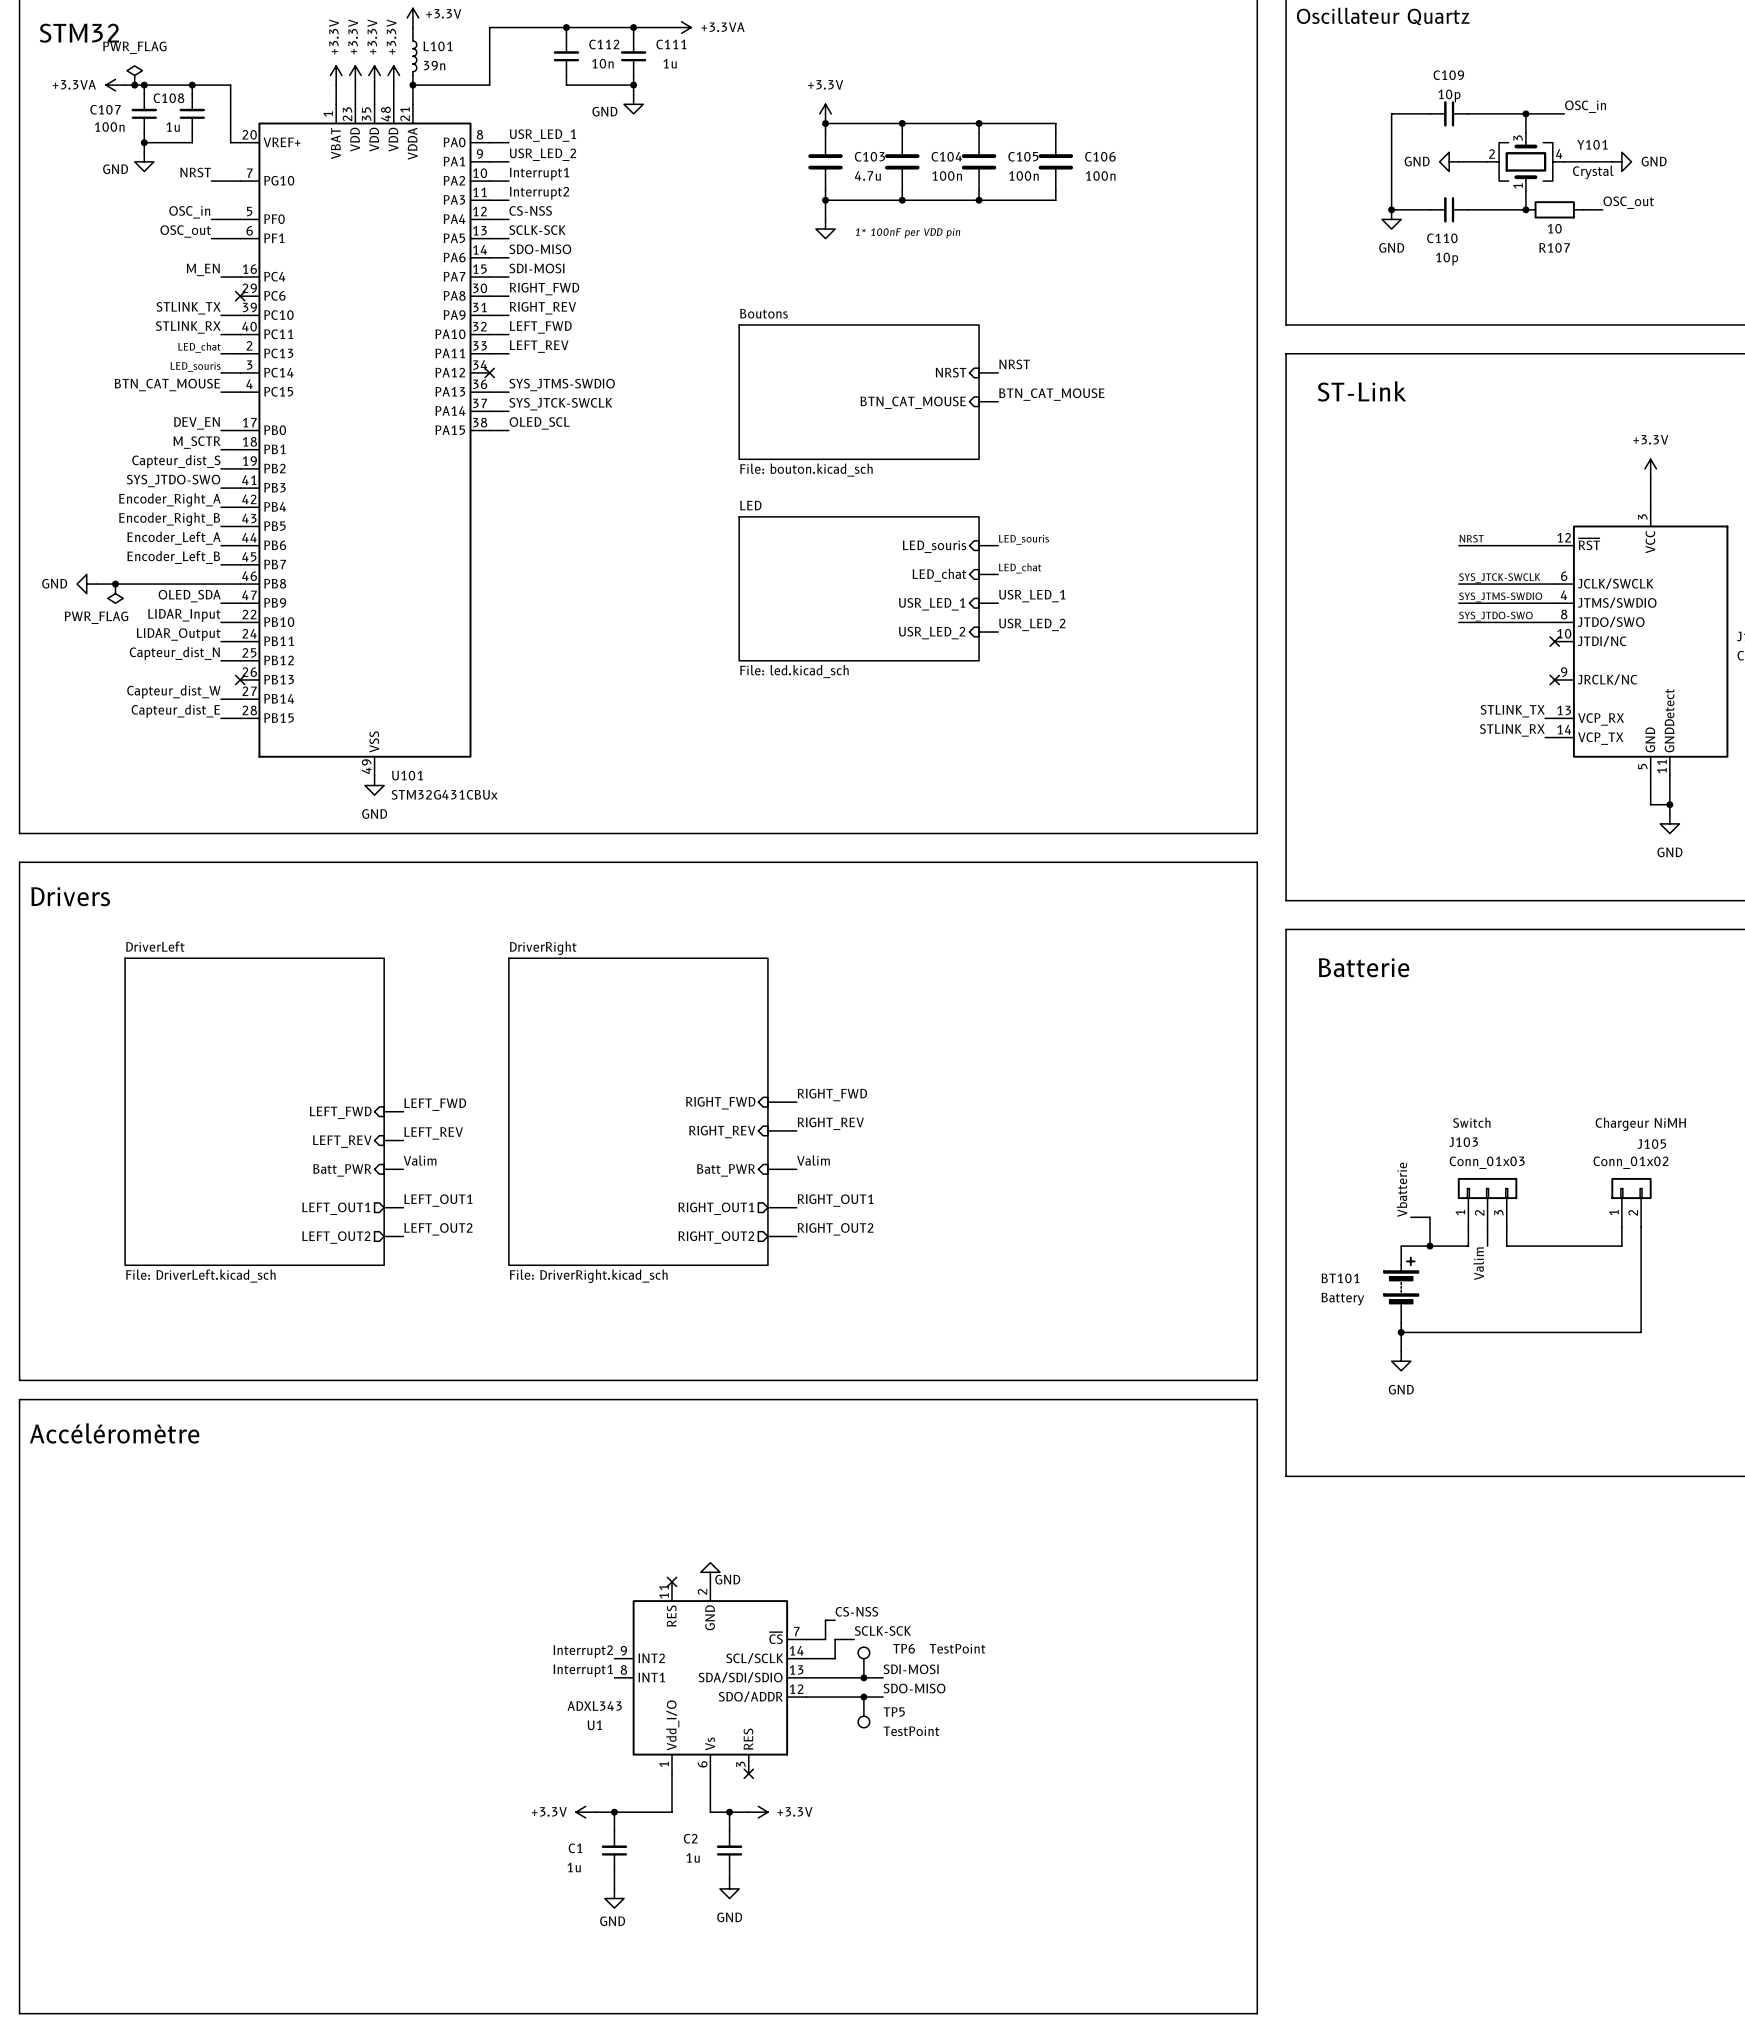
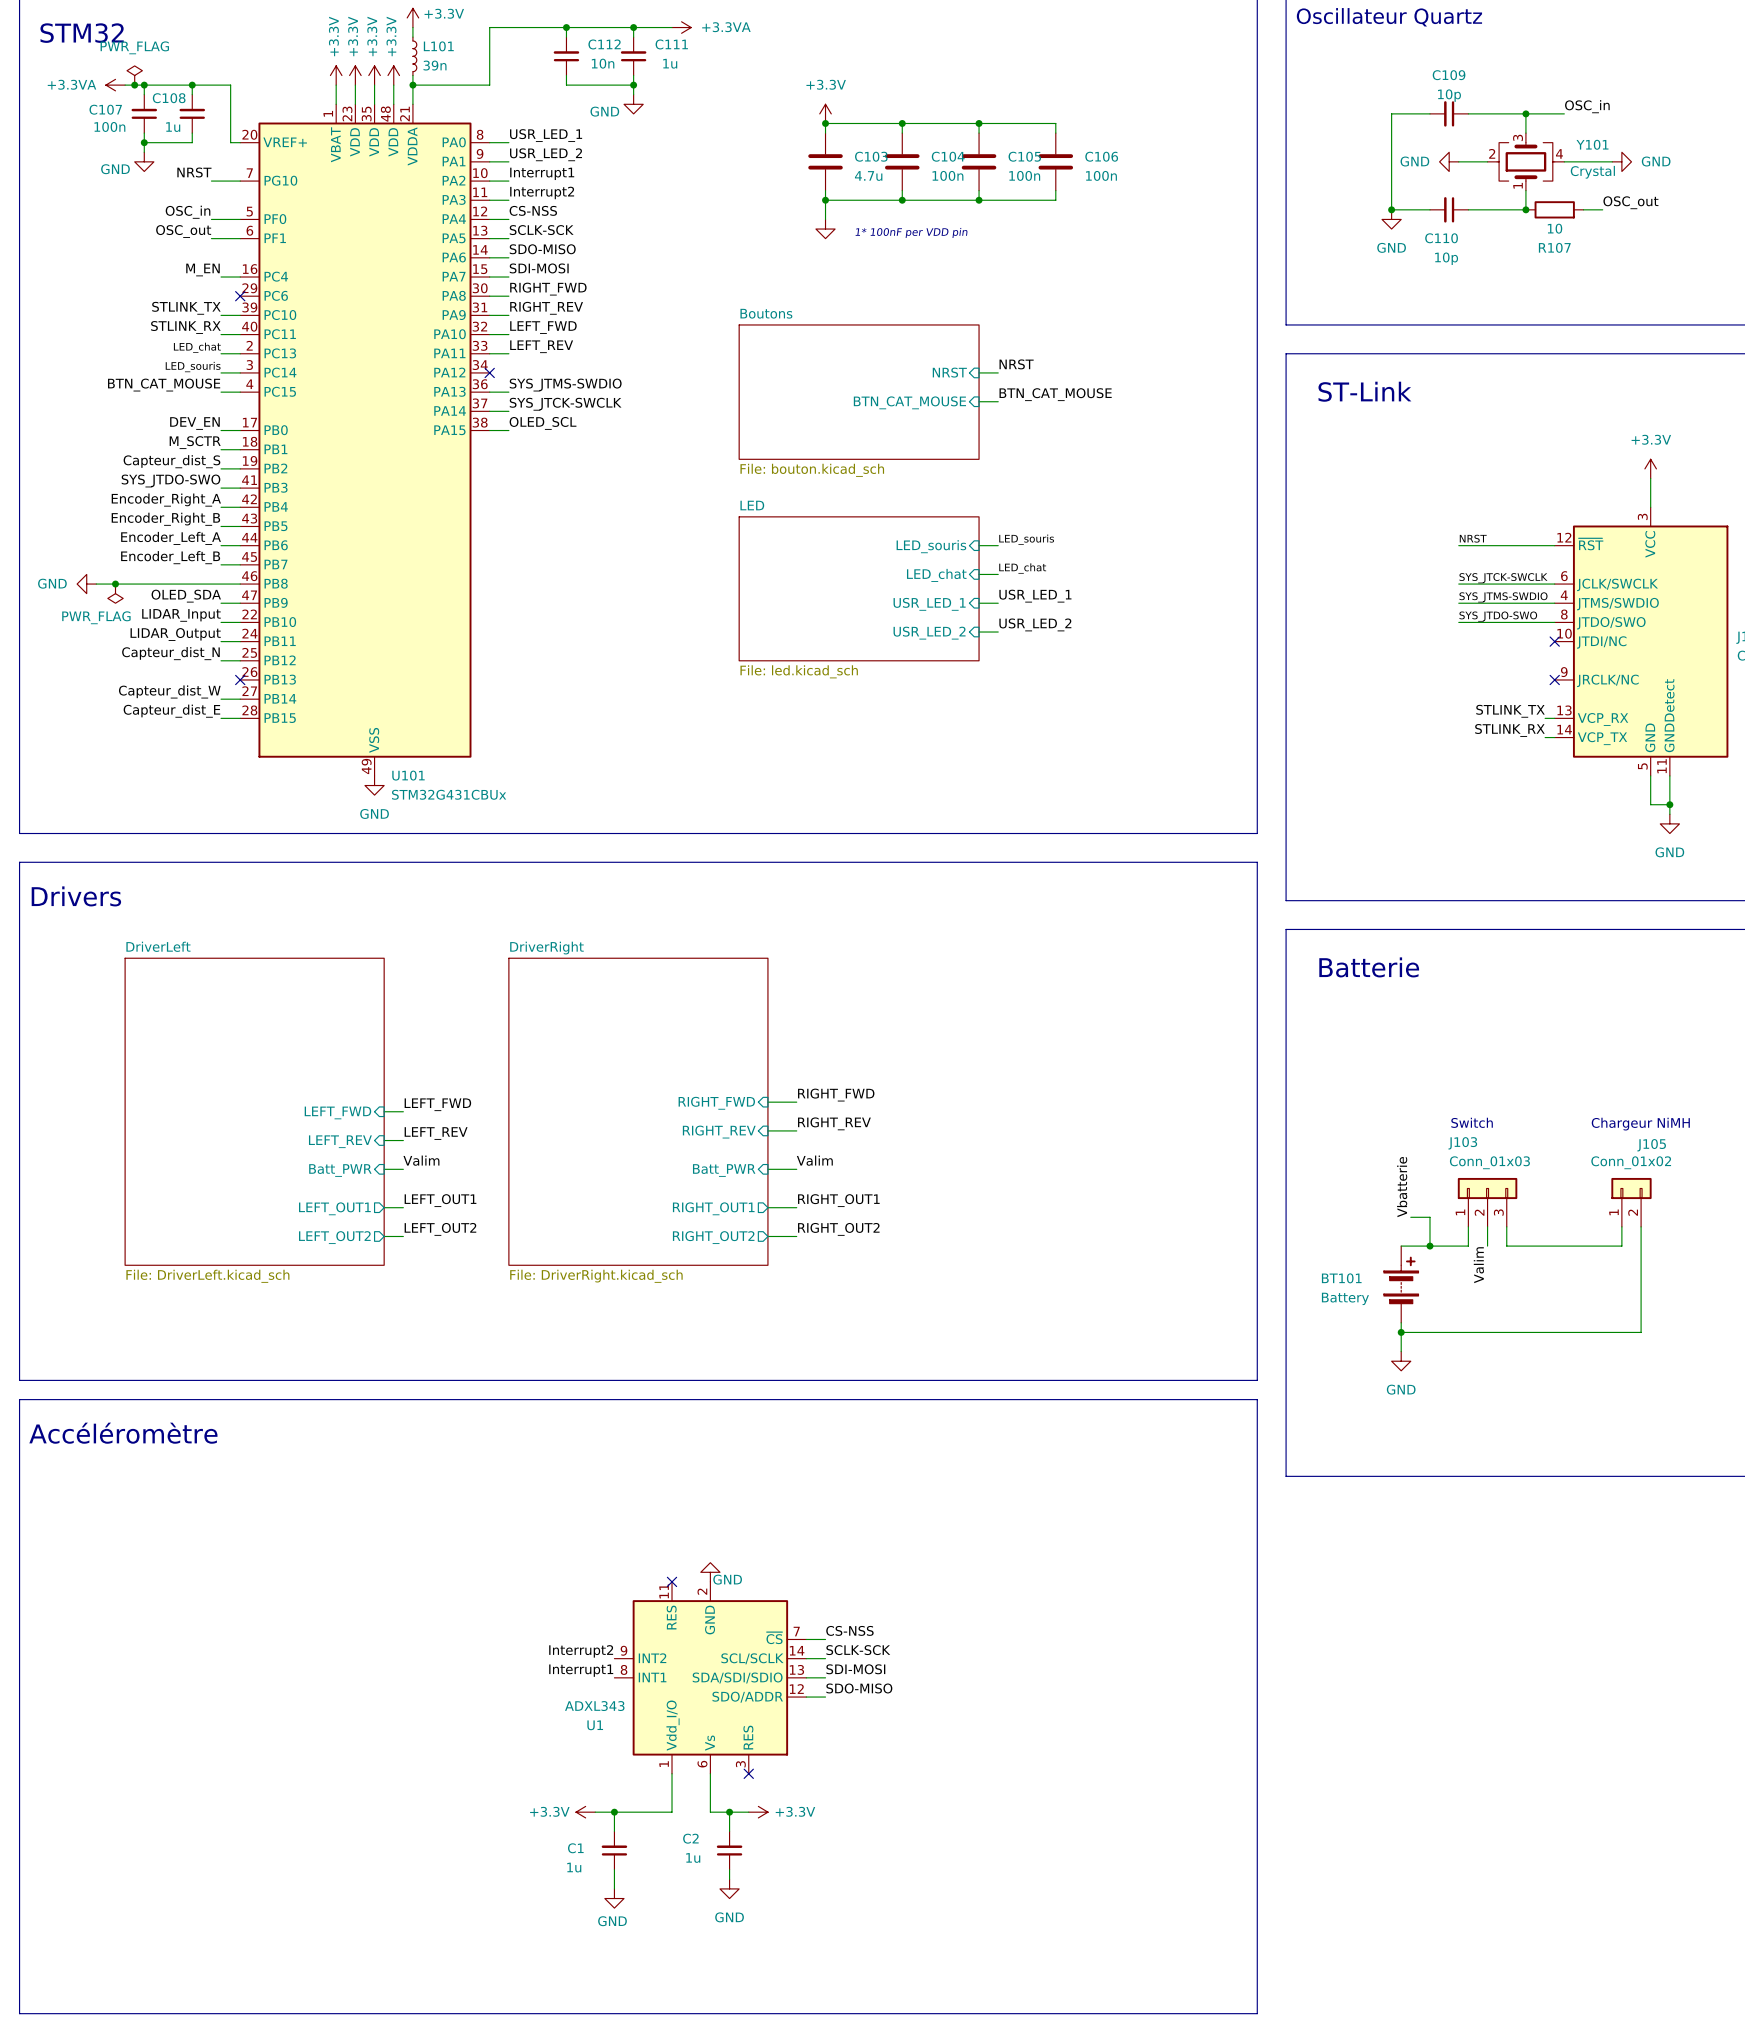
label position: CS-NSS (856, 1611) -> CS-NSS (849, 1630)
wire: (835, 1620) (825, 1620) (825, 1639) -> none
label position: SCLK-SCK (882, 1630) -> SCLK-SCK (858, 1650)
wire: (854, 1639) (835, 1639) (835, 1658) (825, 1658) -> none
TP6: TestPoint (863, 1662) -> none
label position: SDI-MOSI (911, 1669) -> SDI-MOSI (855, 1669)
wire: (825, 1677) (883, 1677) -> none
junction: (863, 1677) -> none
label position: SDO-MISO (914, 1688) -> SDO-MISO (859, 1688)
wire: (825, 1697) (883, 1697) -> none
junction: (863, 1697) -> none
TP5: TestPoint (863, 1712) -> none

